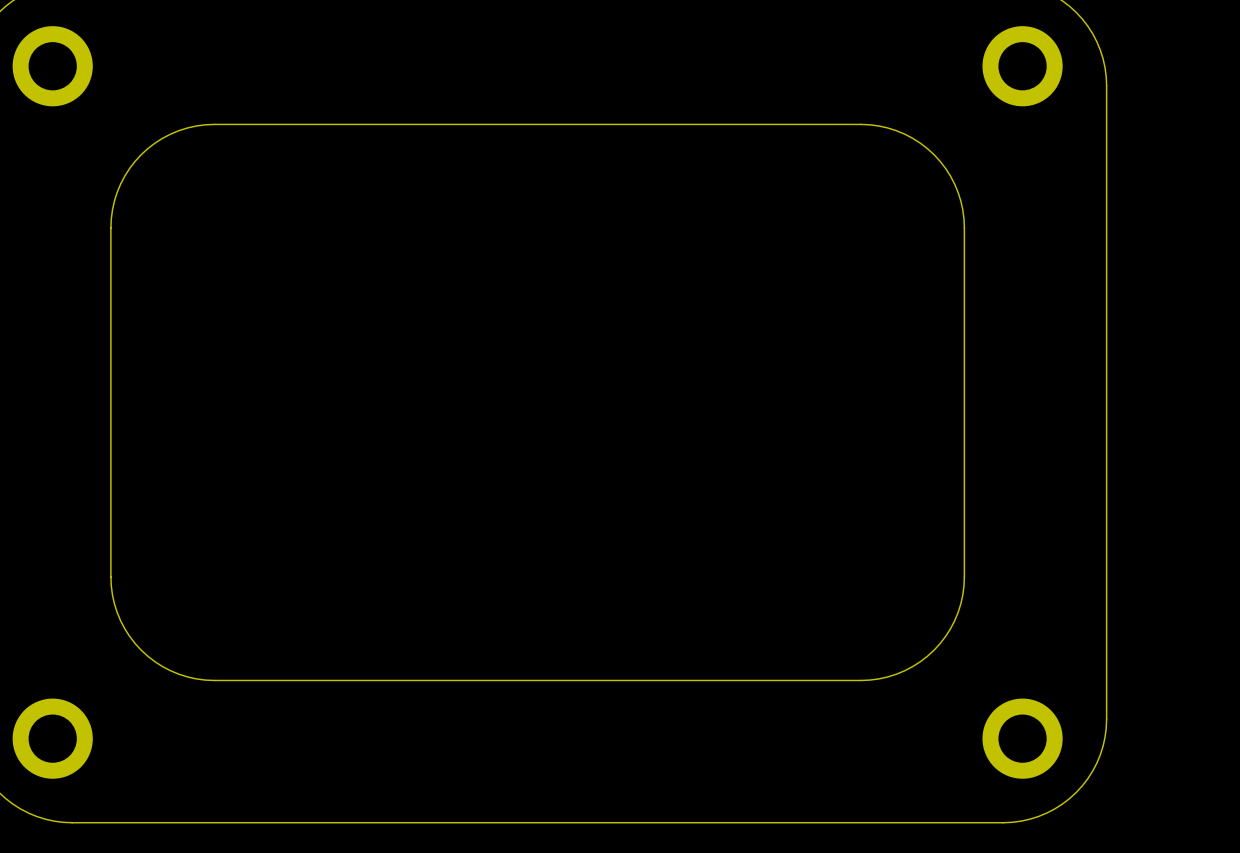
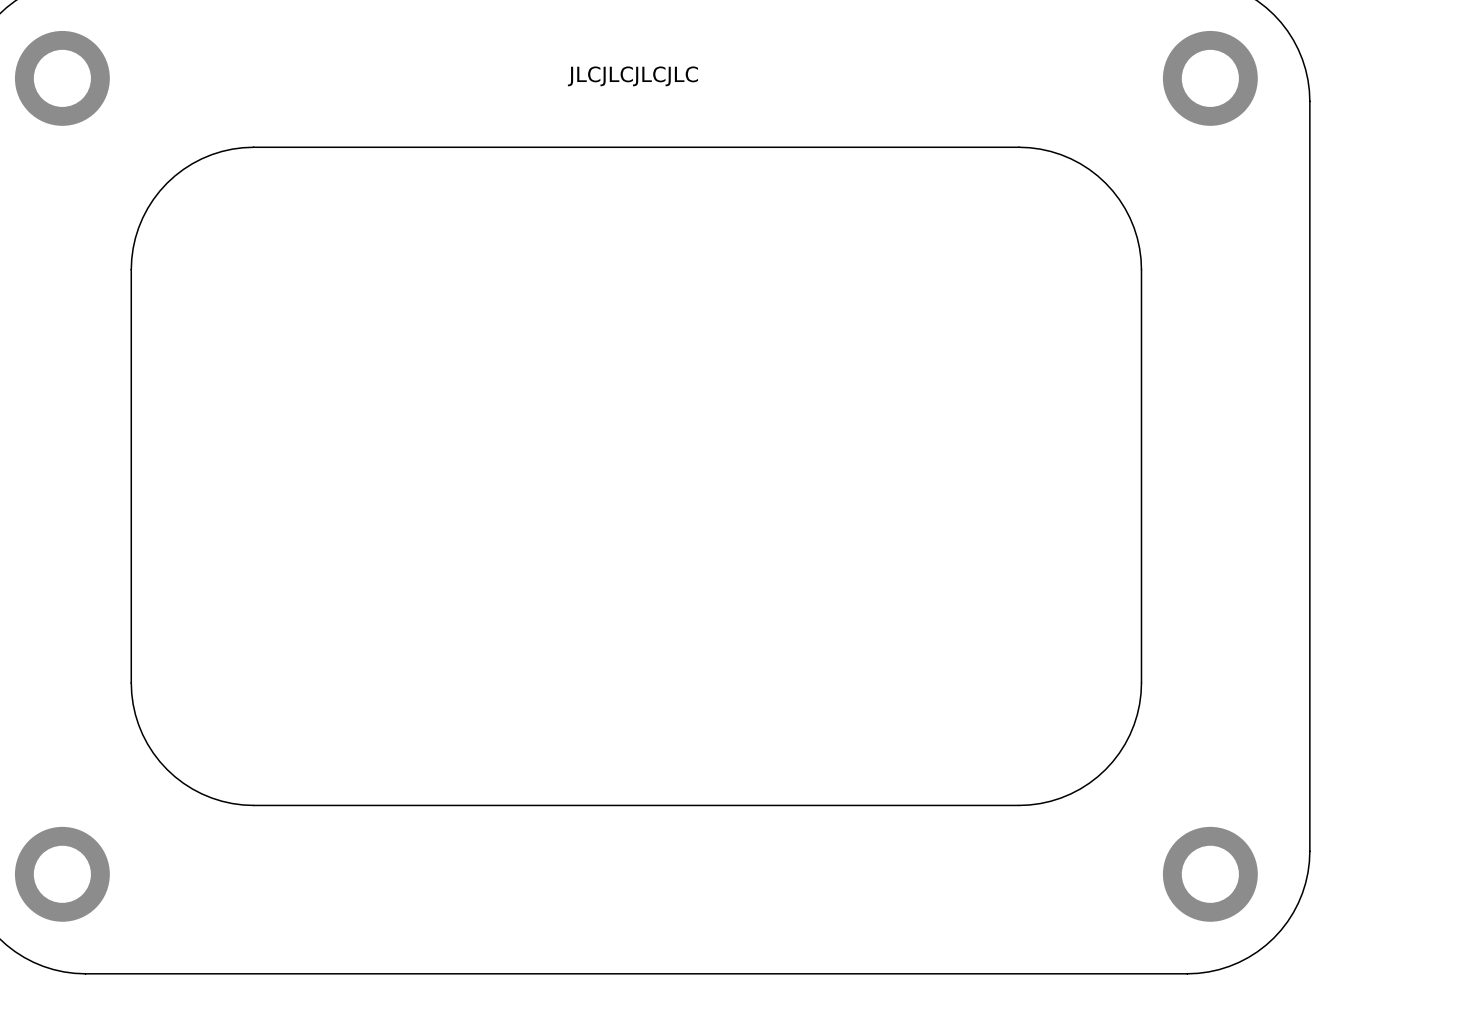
drawing: none -> [567, 66, 699, 87]

